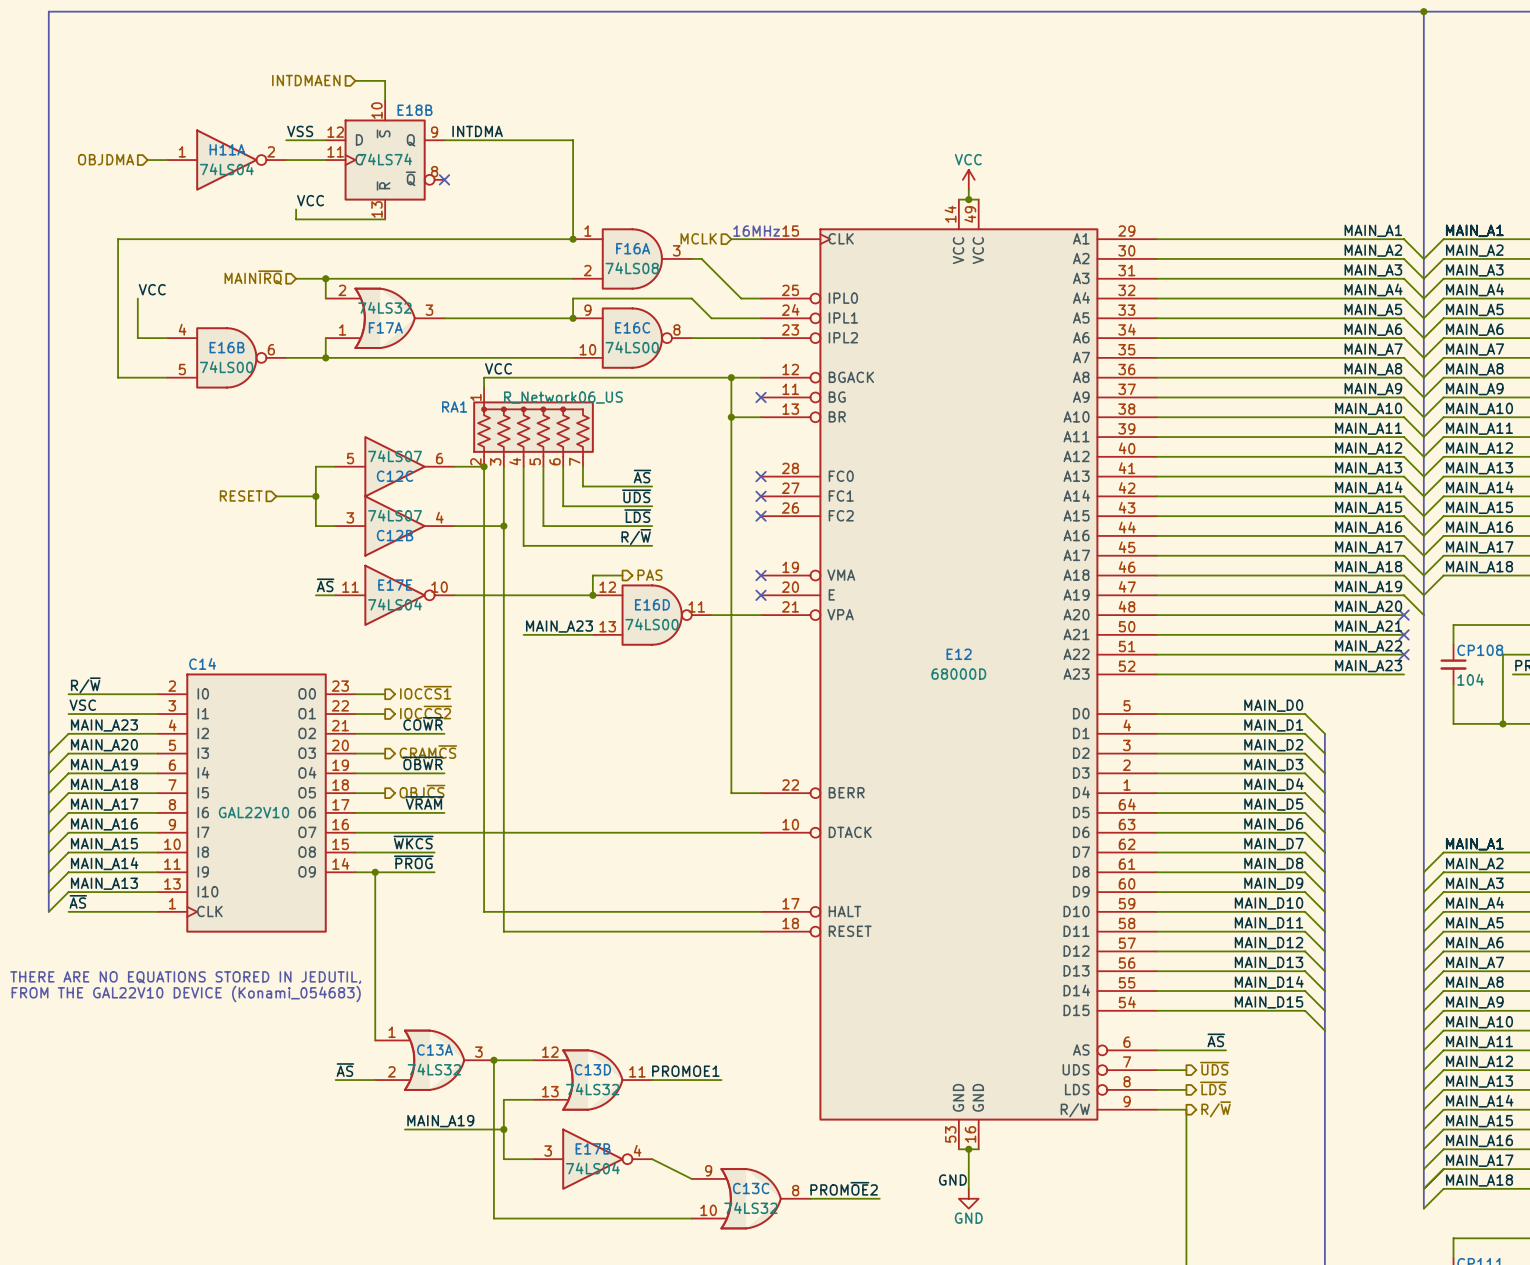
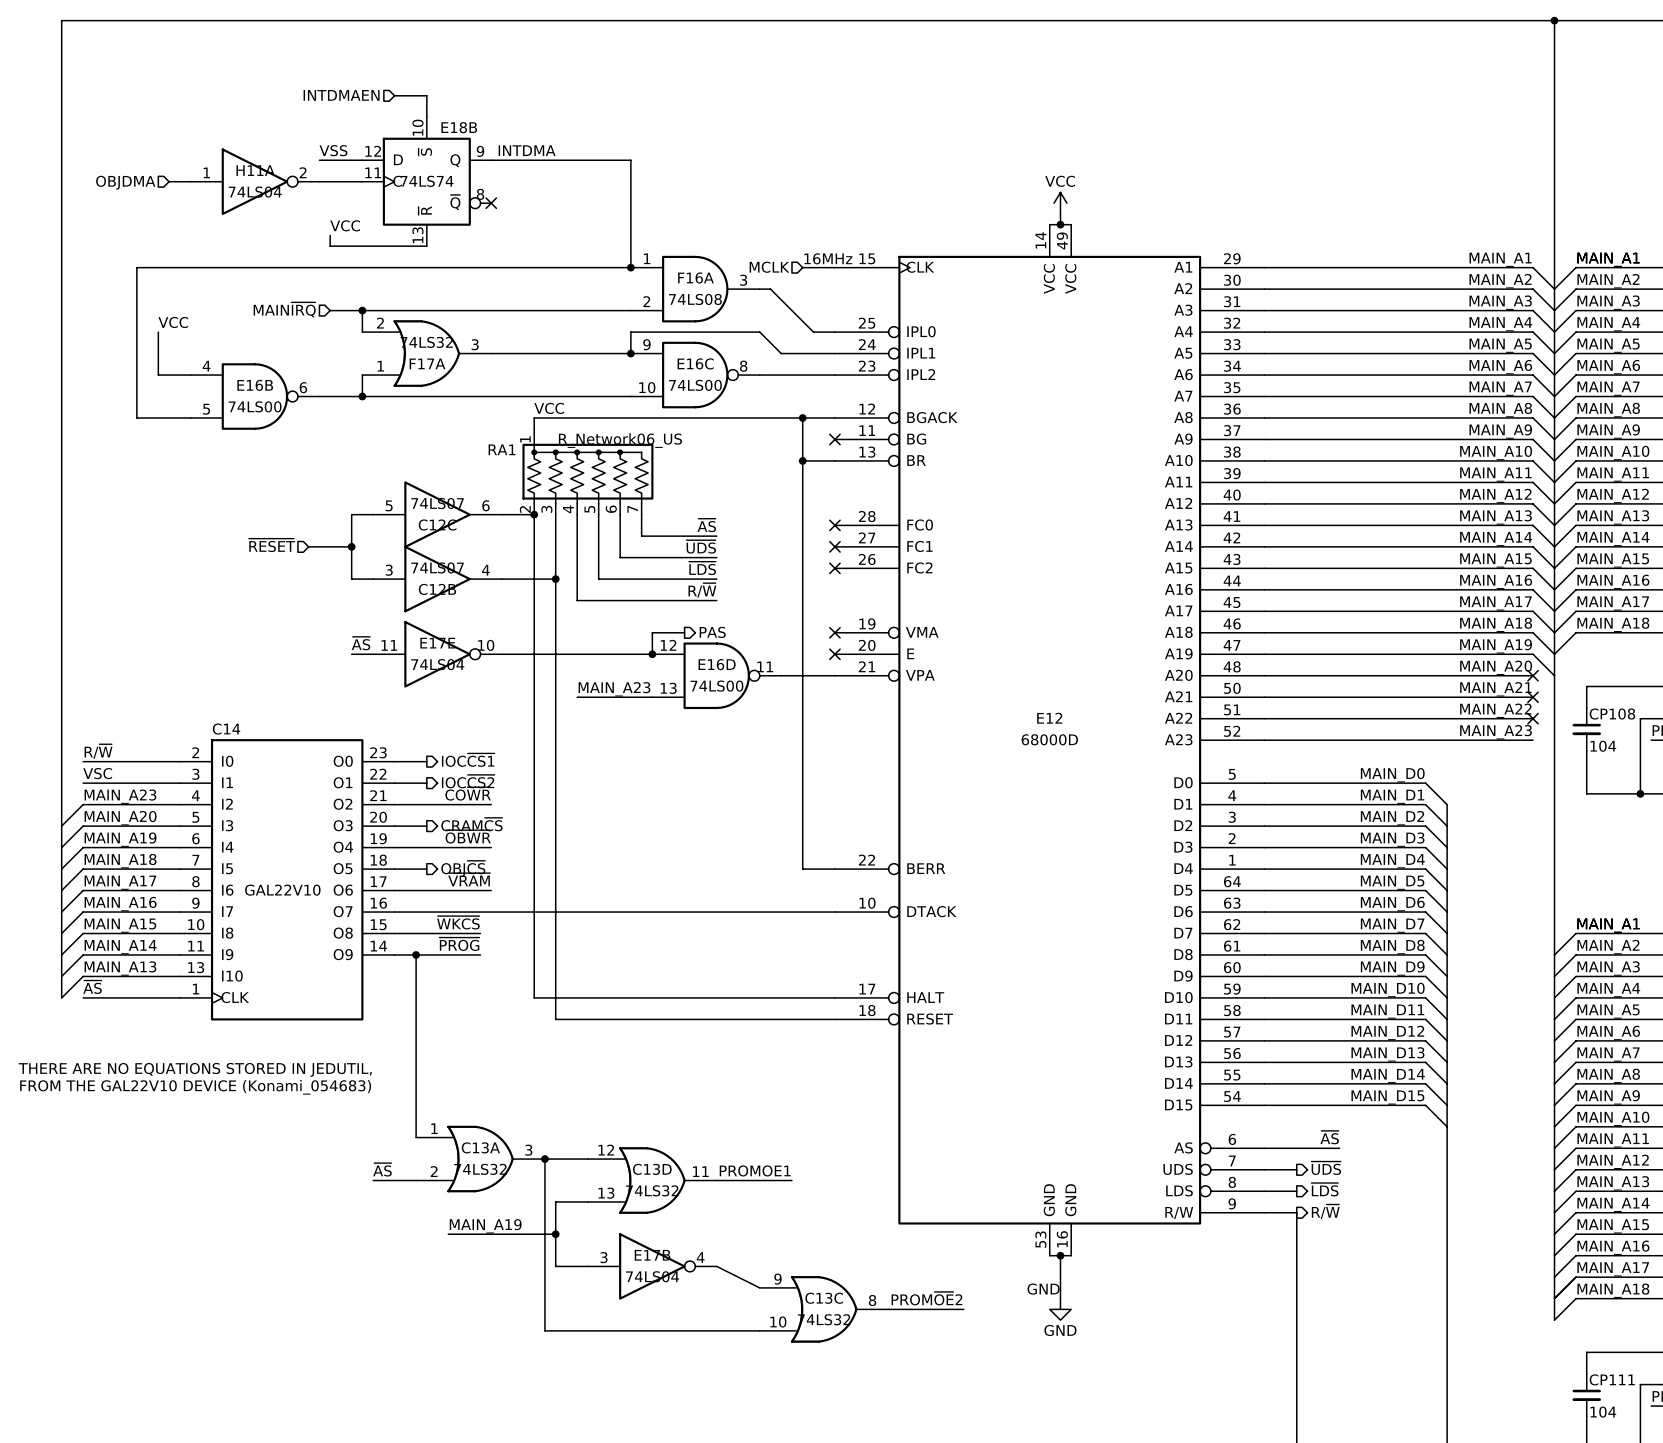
hierarchical label: RESET (241, 496) -> ~{RESET} (272, 545)

